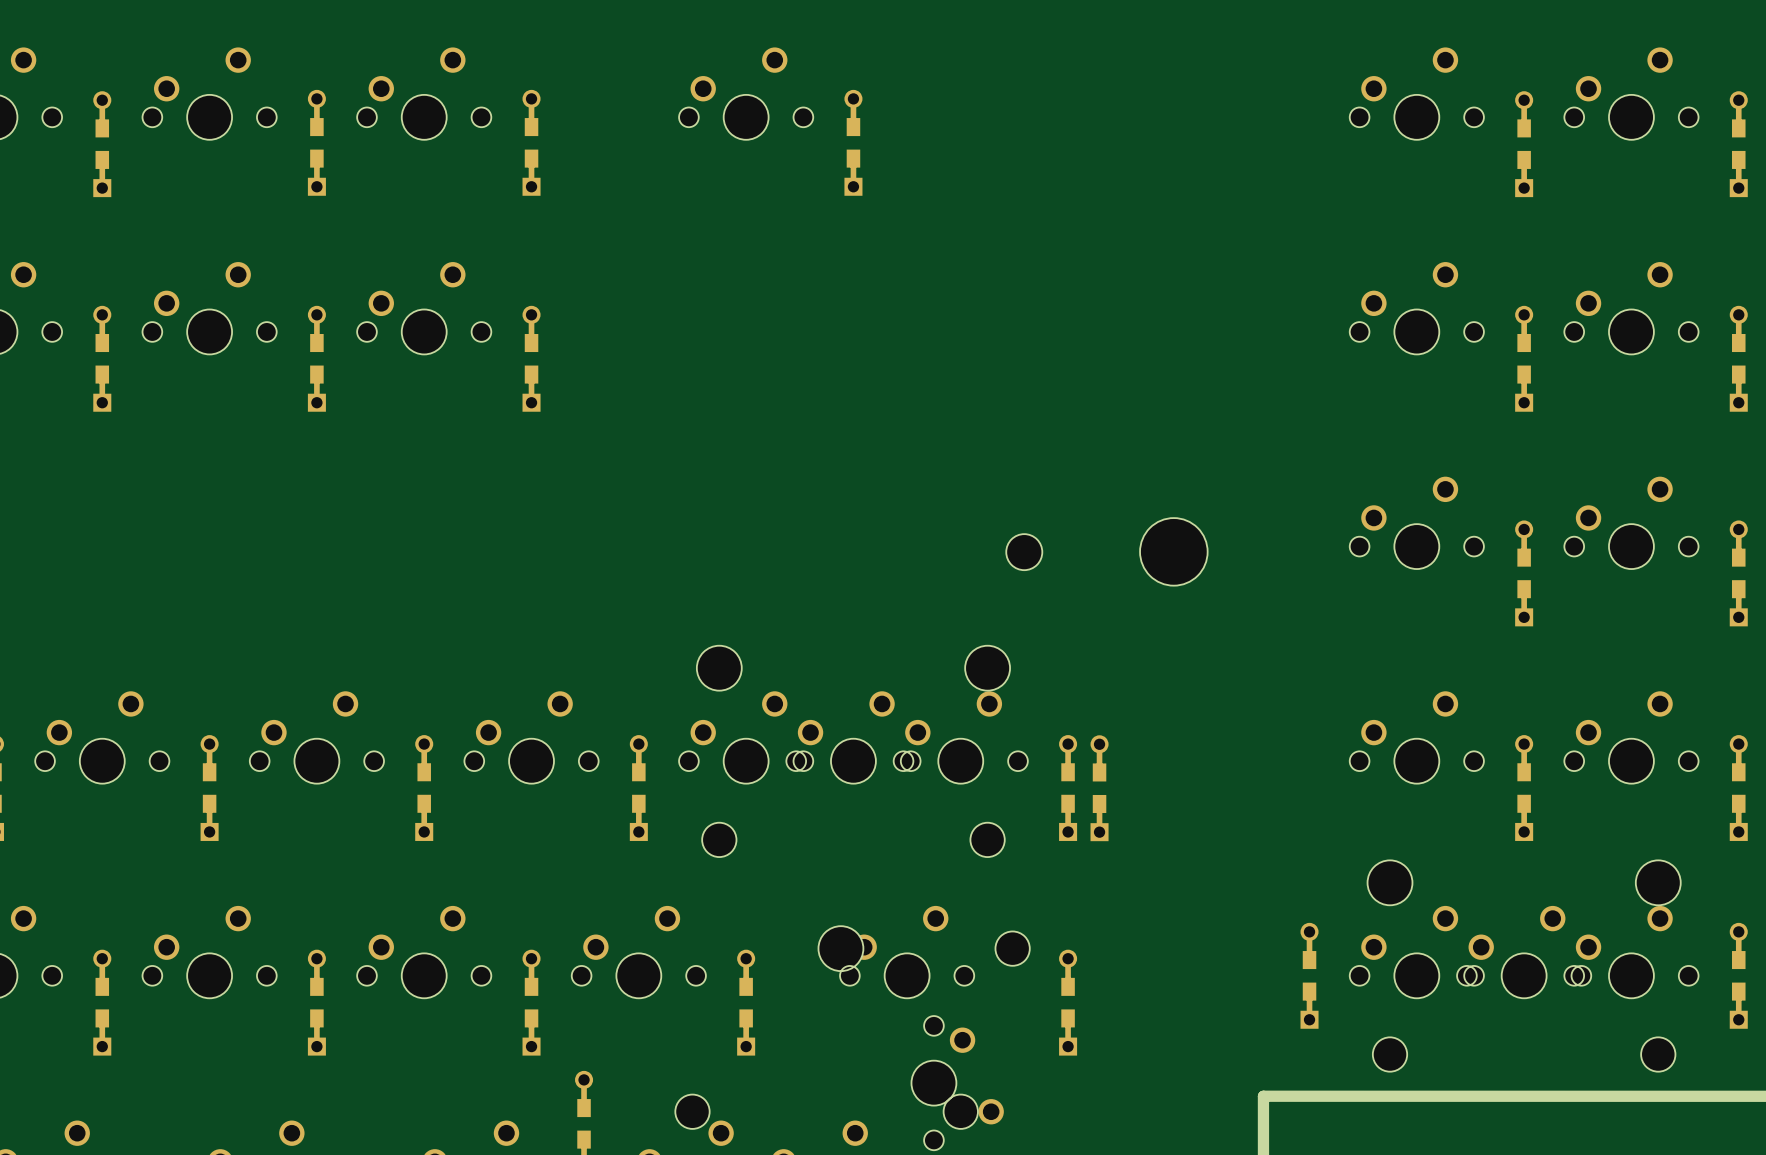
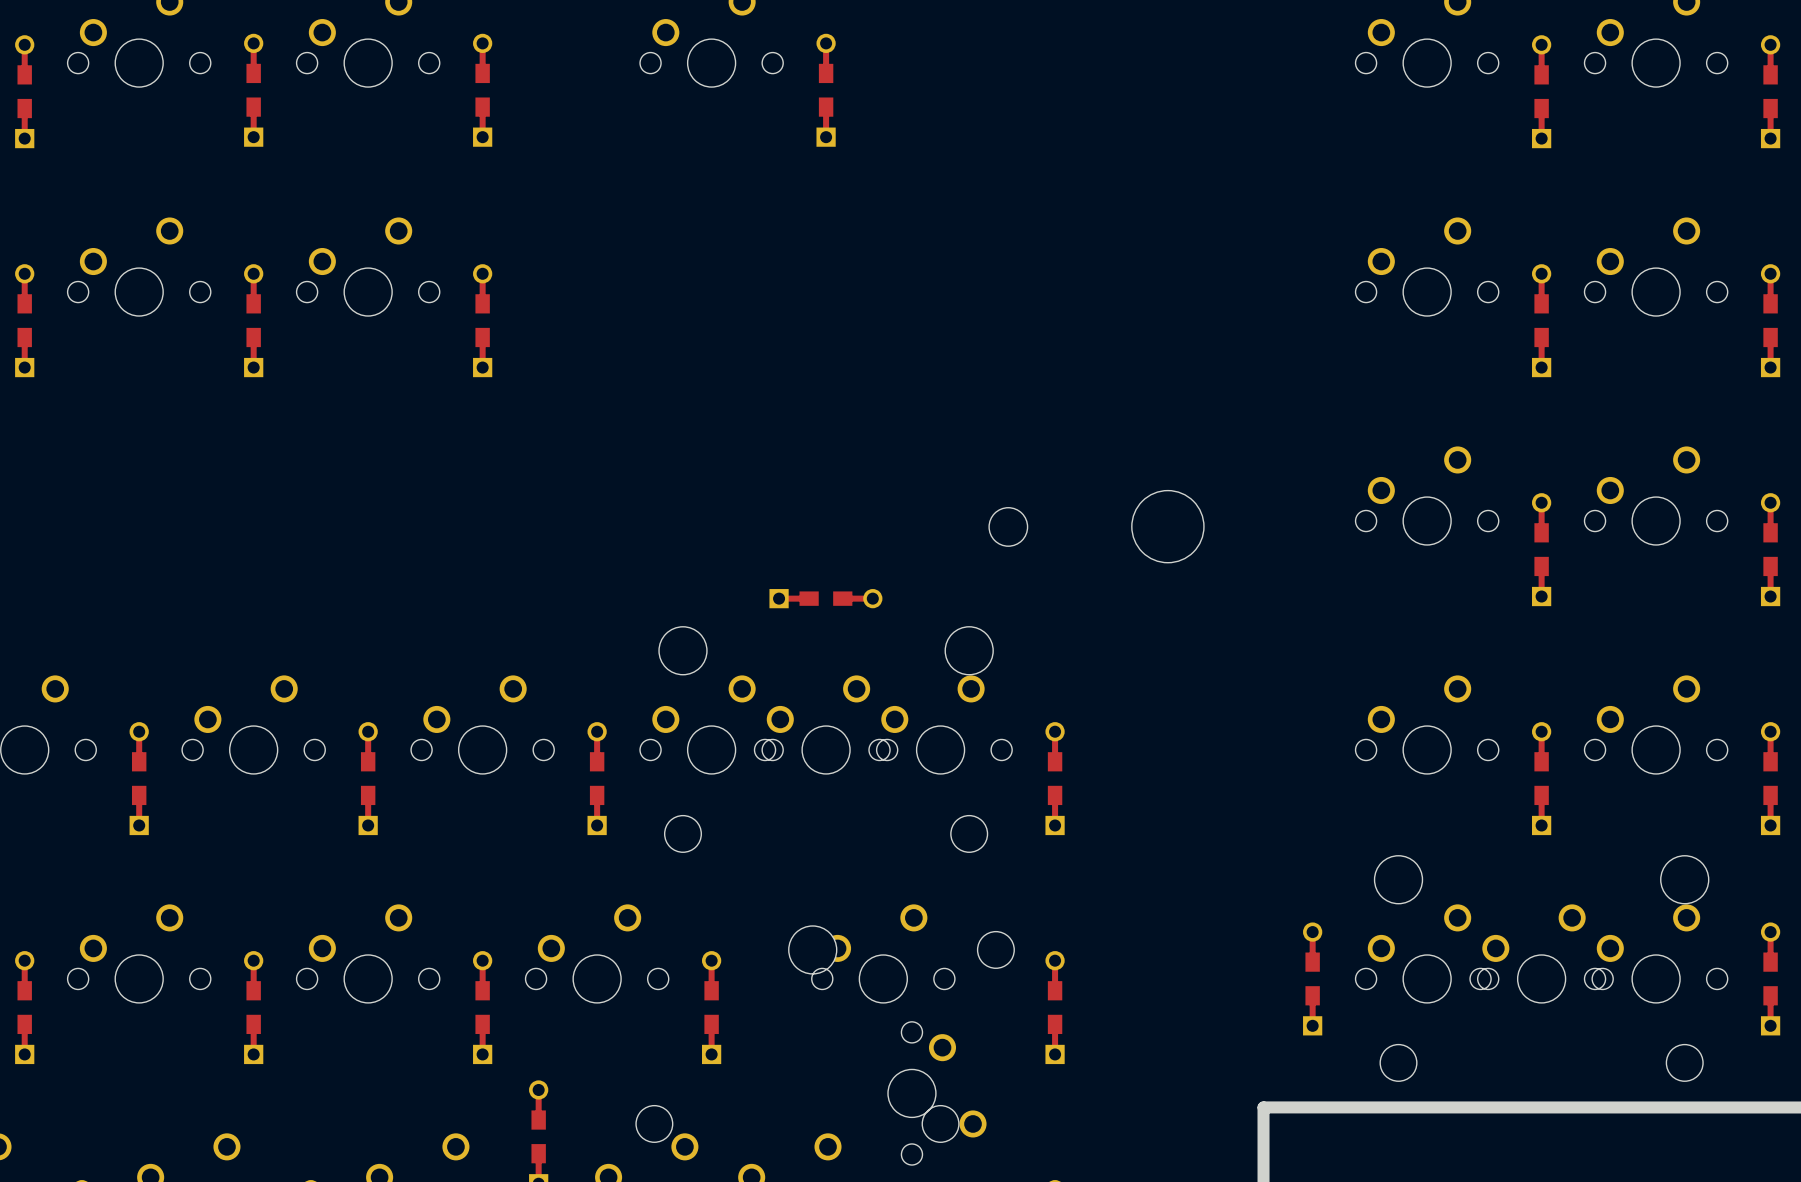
part: none -> (825, 598)
part: (1099, 788) -> none

